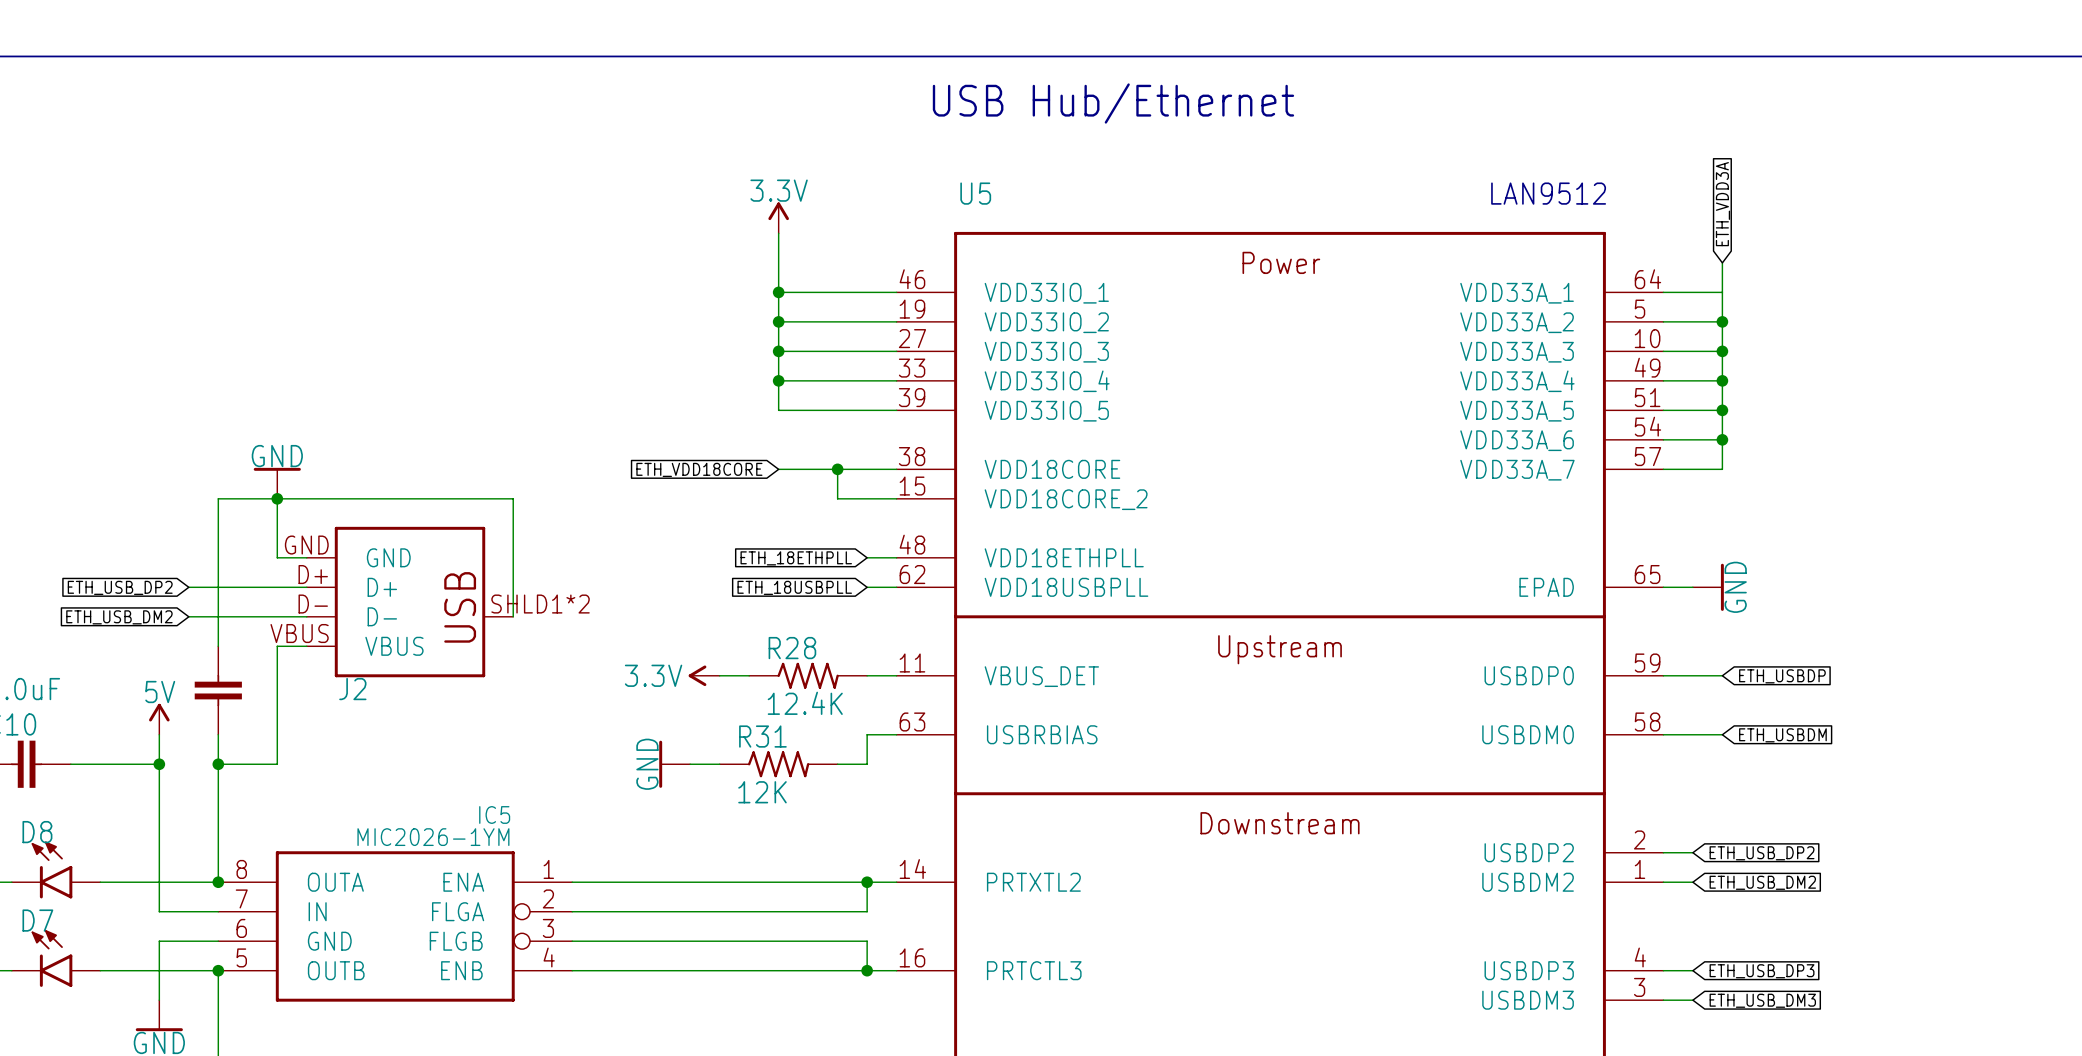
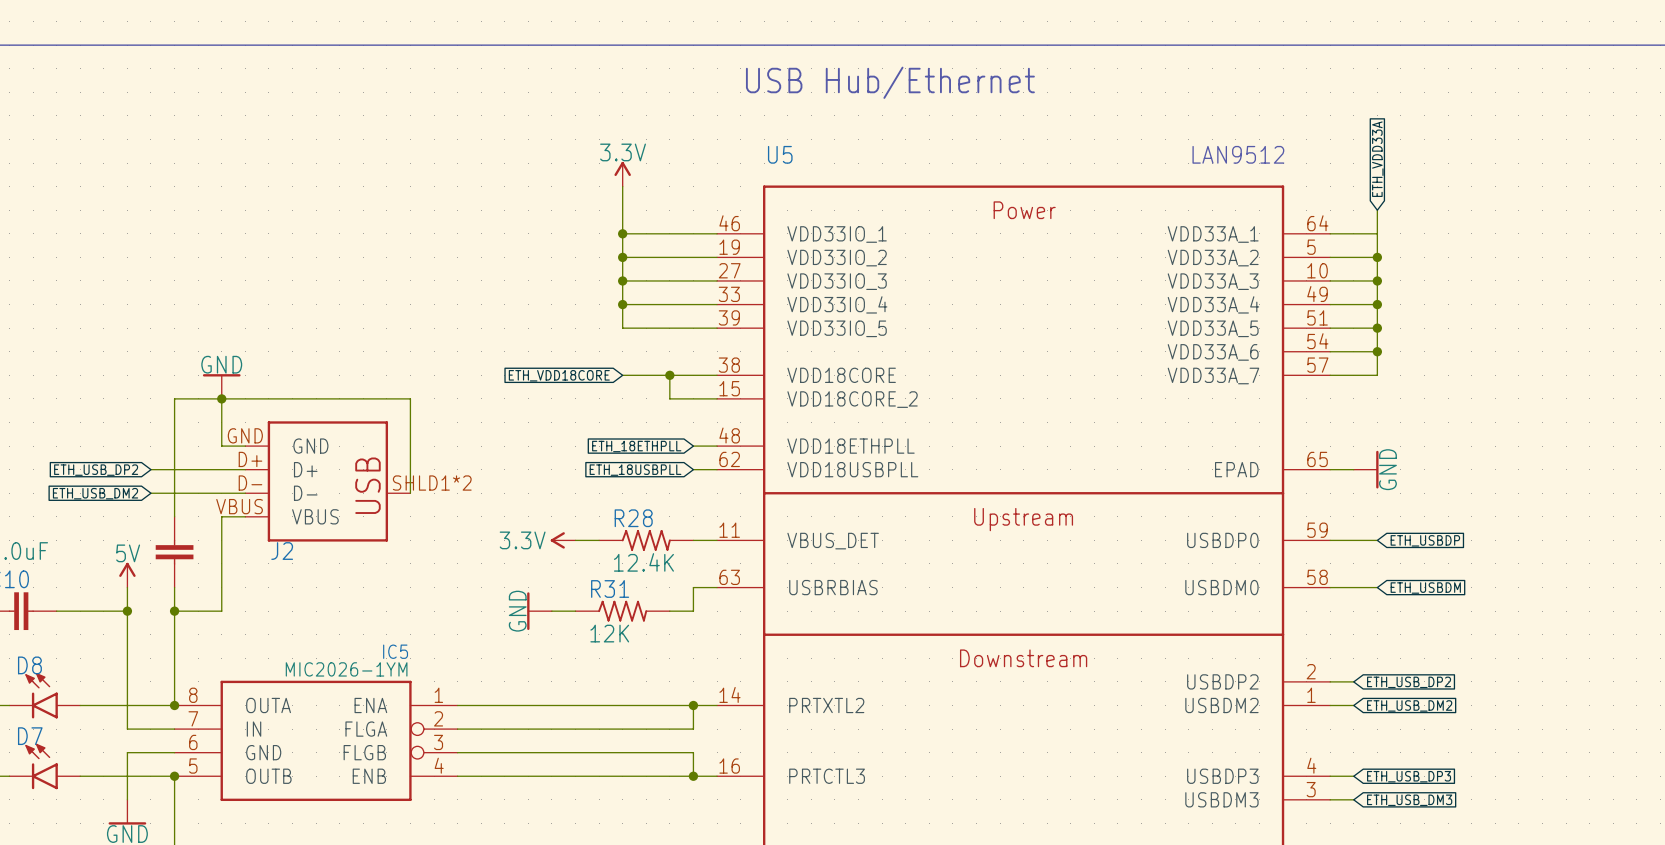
global label: ETH_VDD3A (1722, 204) -> ETH_VDD33A (1377, 159)

